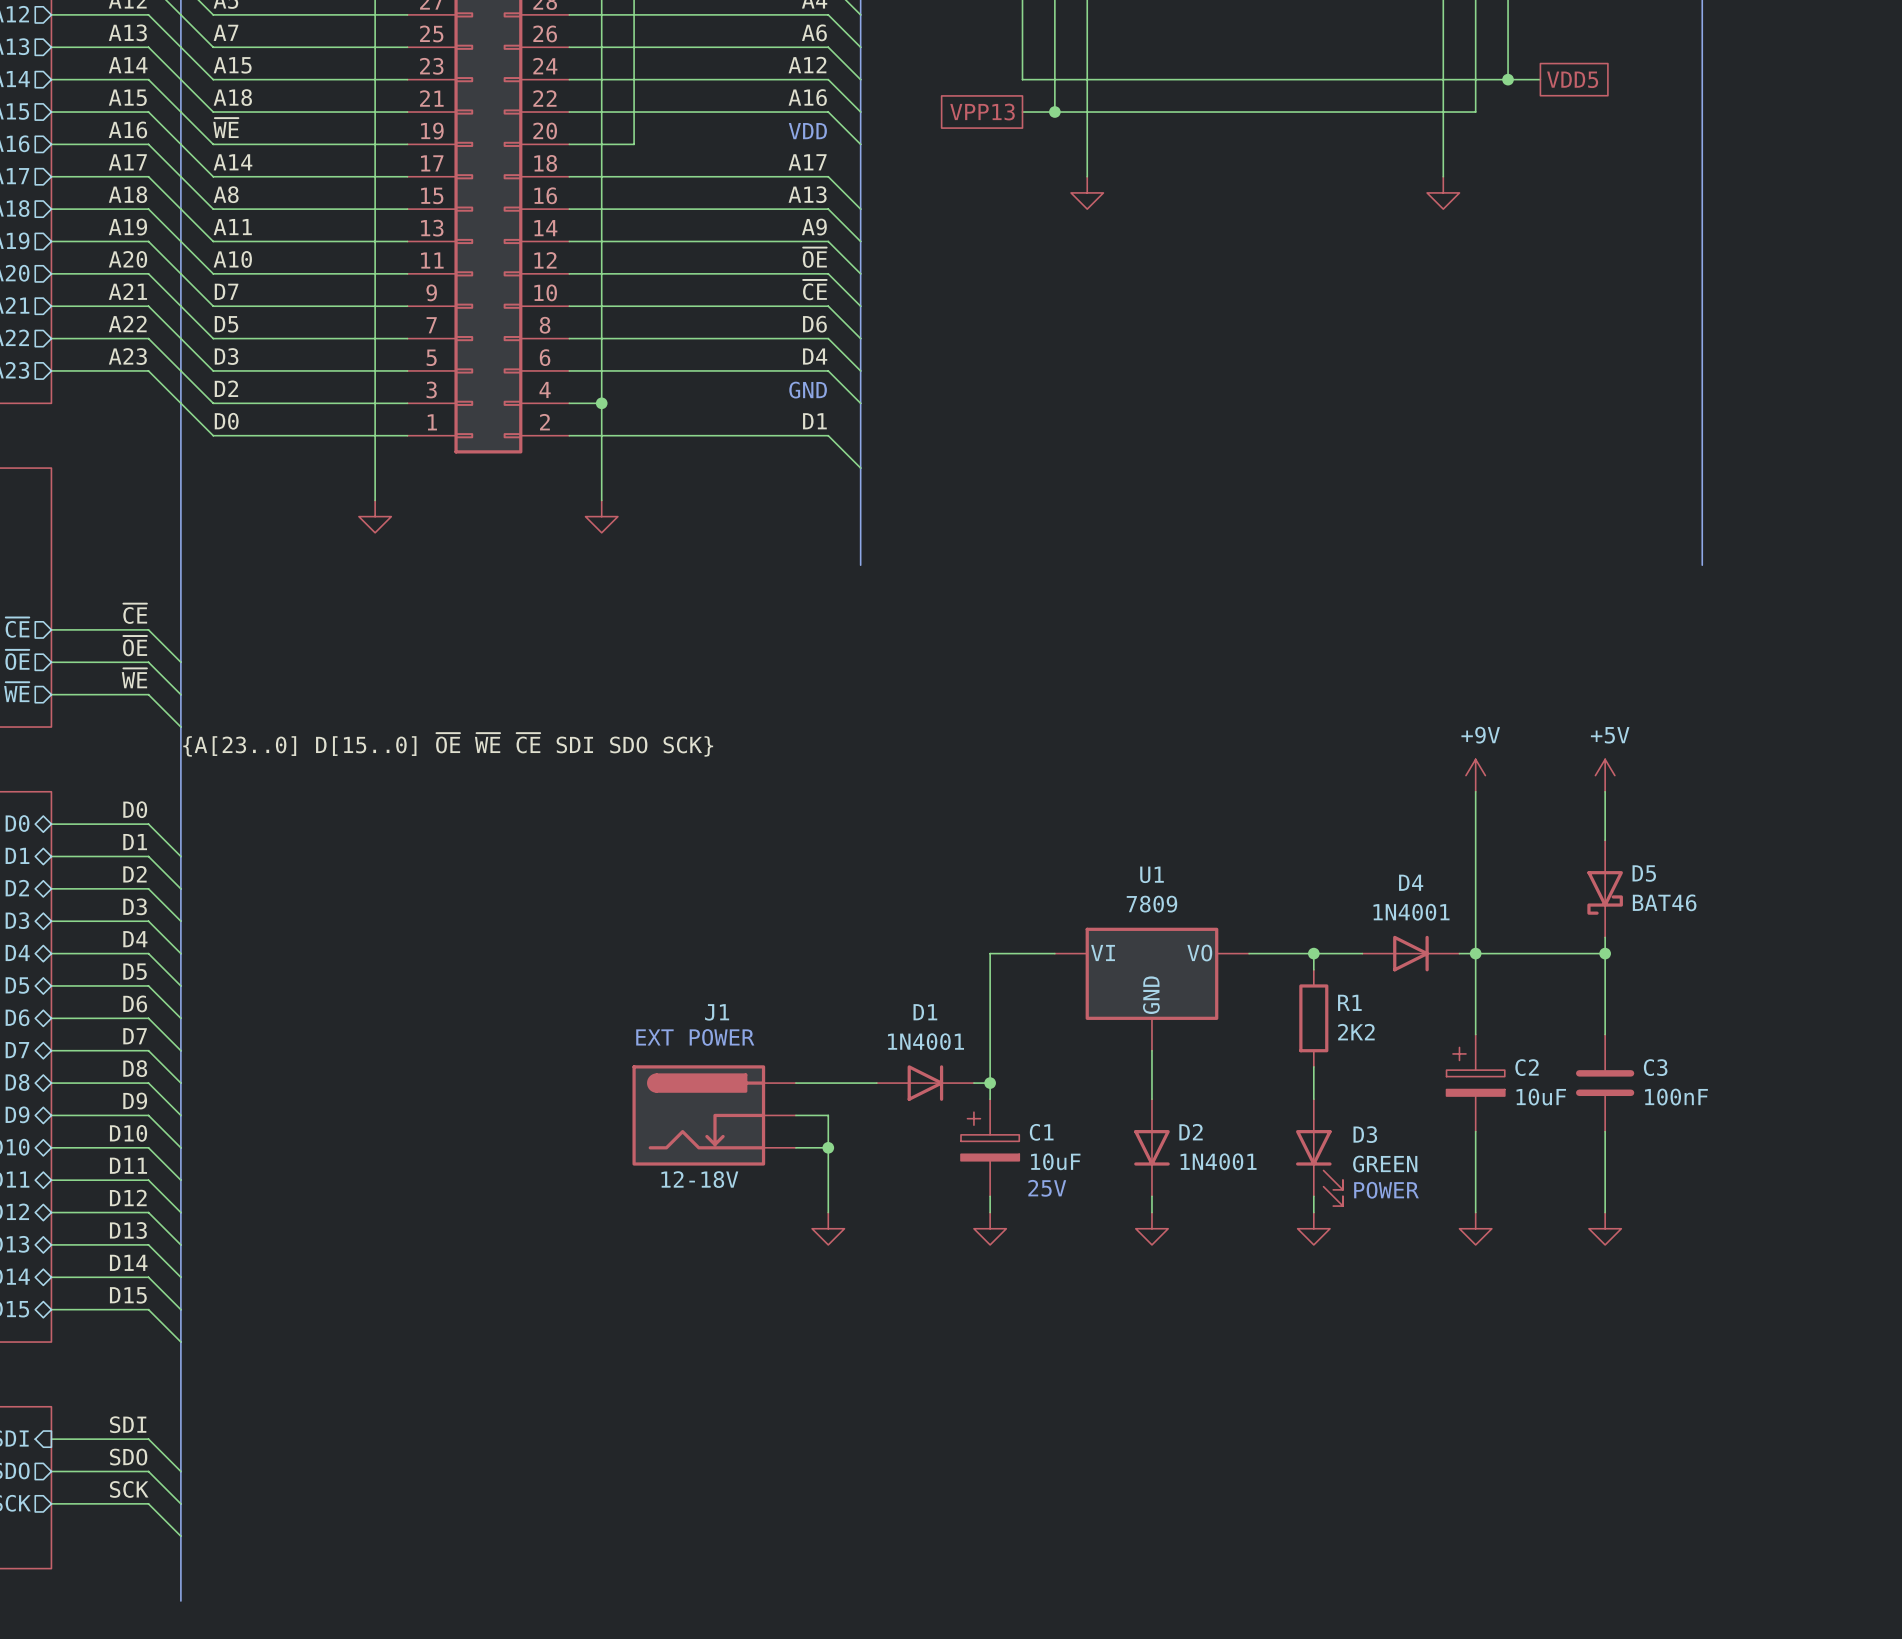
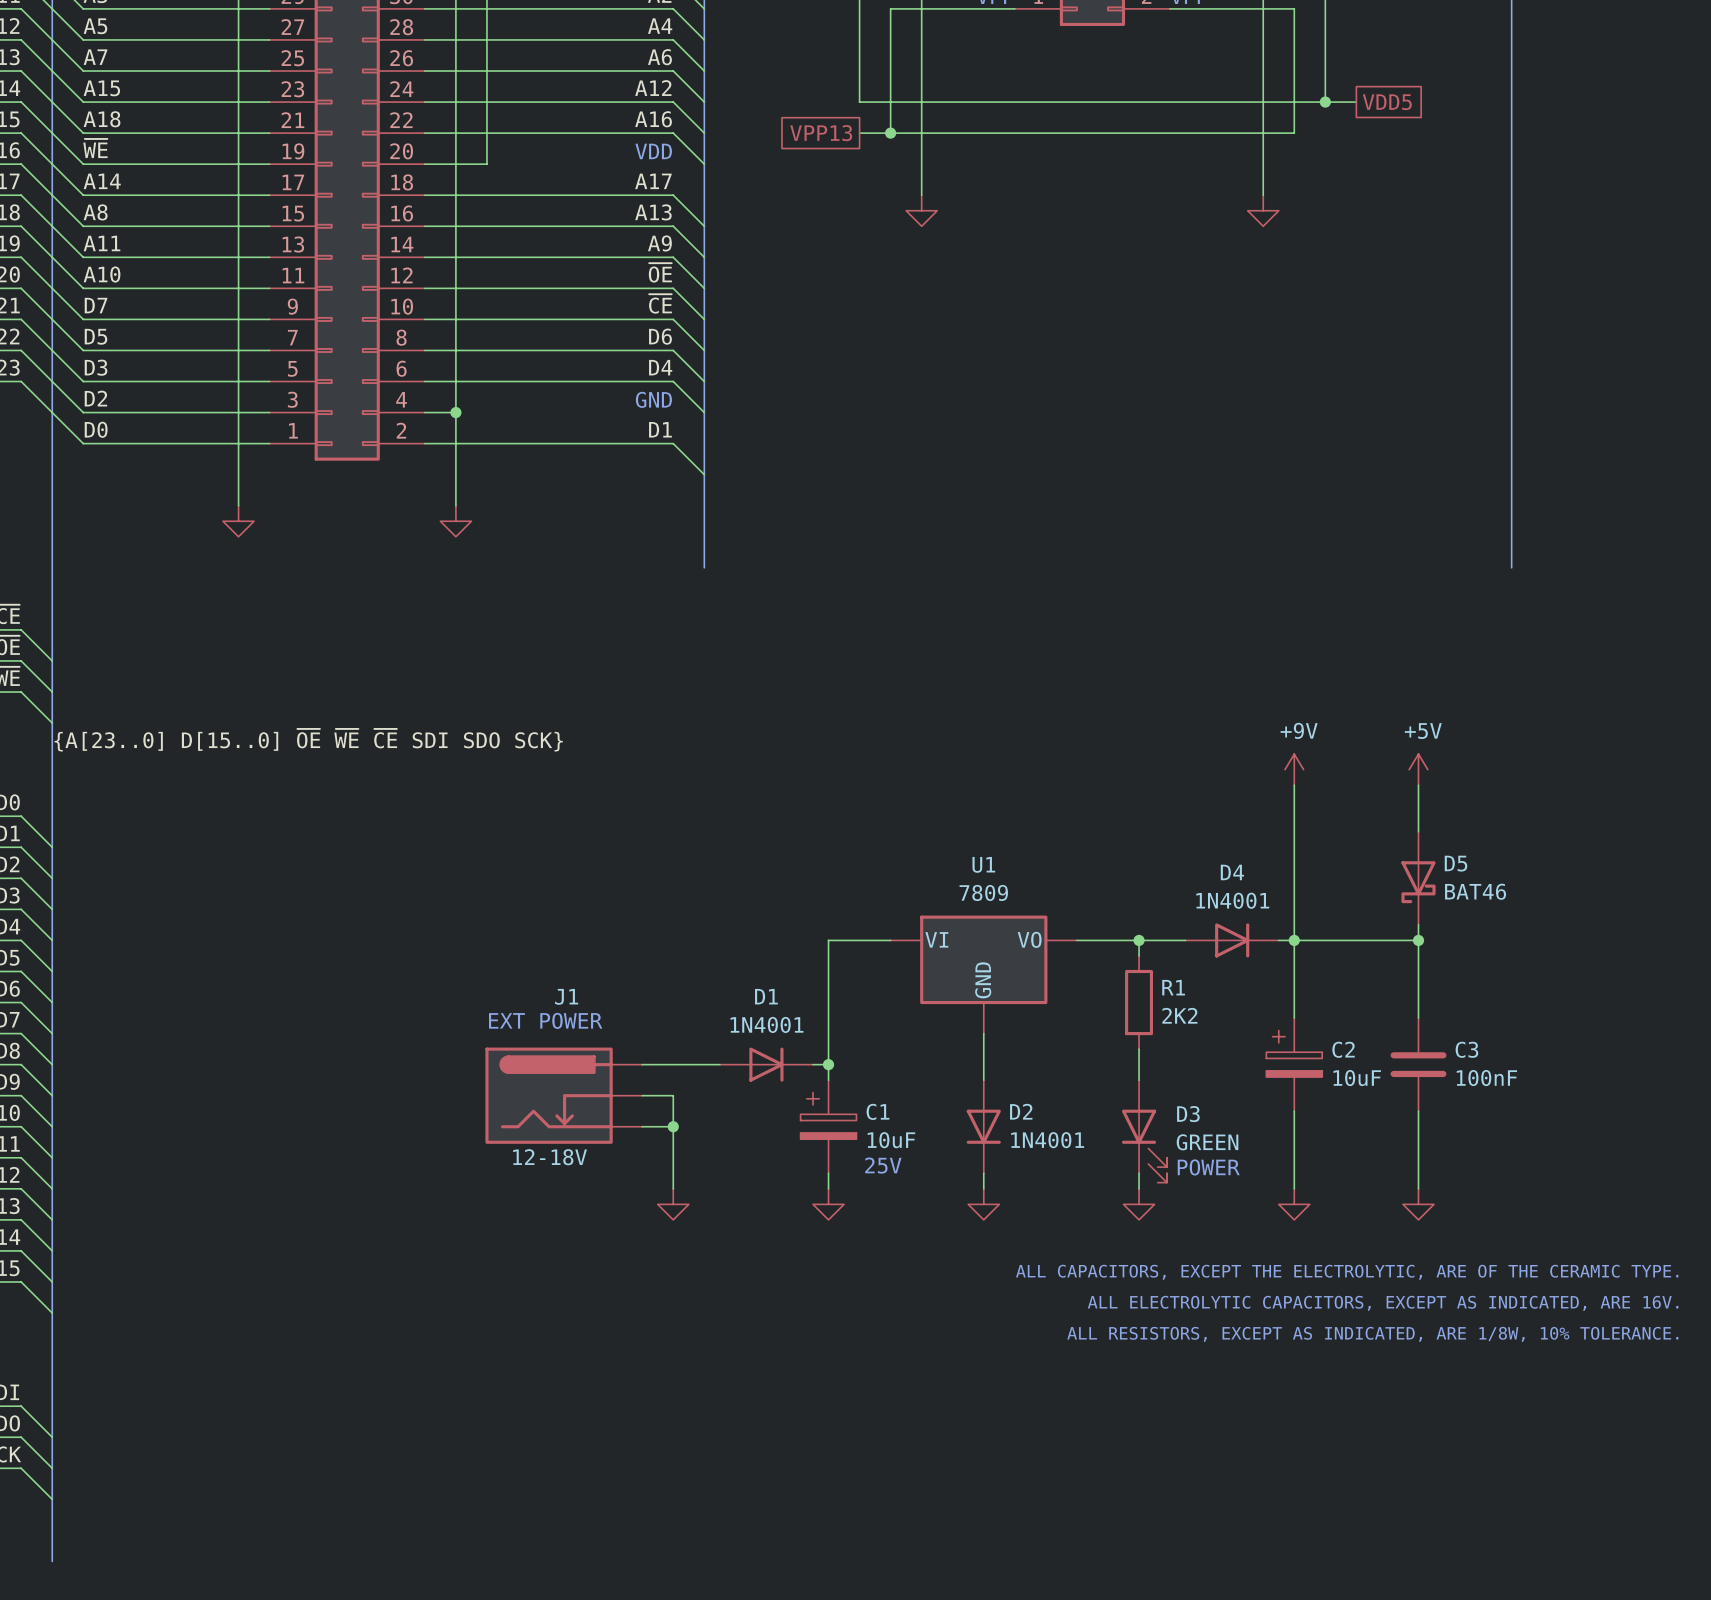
text: none -> ALL CAPACITORS, EXCEPT THE ELECTROLYTIC, ARE OF THE CERAMIC TYPE. (1347, 1272)
text: none -> ALL ELECTROLYTIC CAPACITORS, EXCEPT AS INDICATED, ARE 16V. (1383, 1303)
text: none -> ALL RESISTORS, EXCEPT AS INDICATED, ARE 1/8W, 10% TOLERANCE. (1372, 1334)

